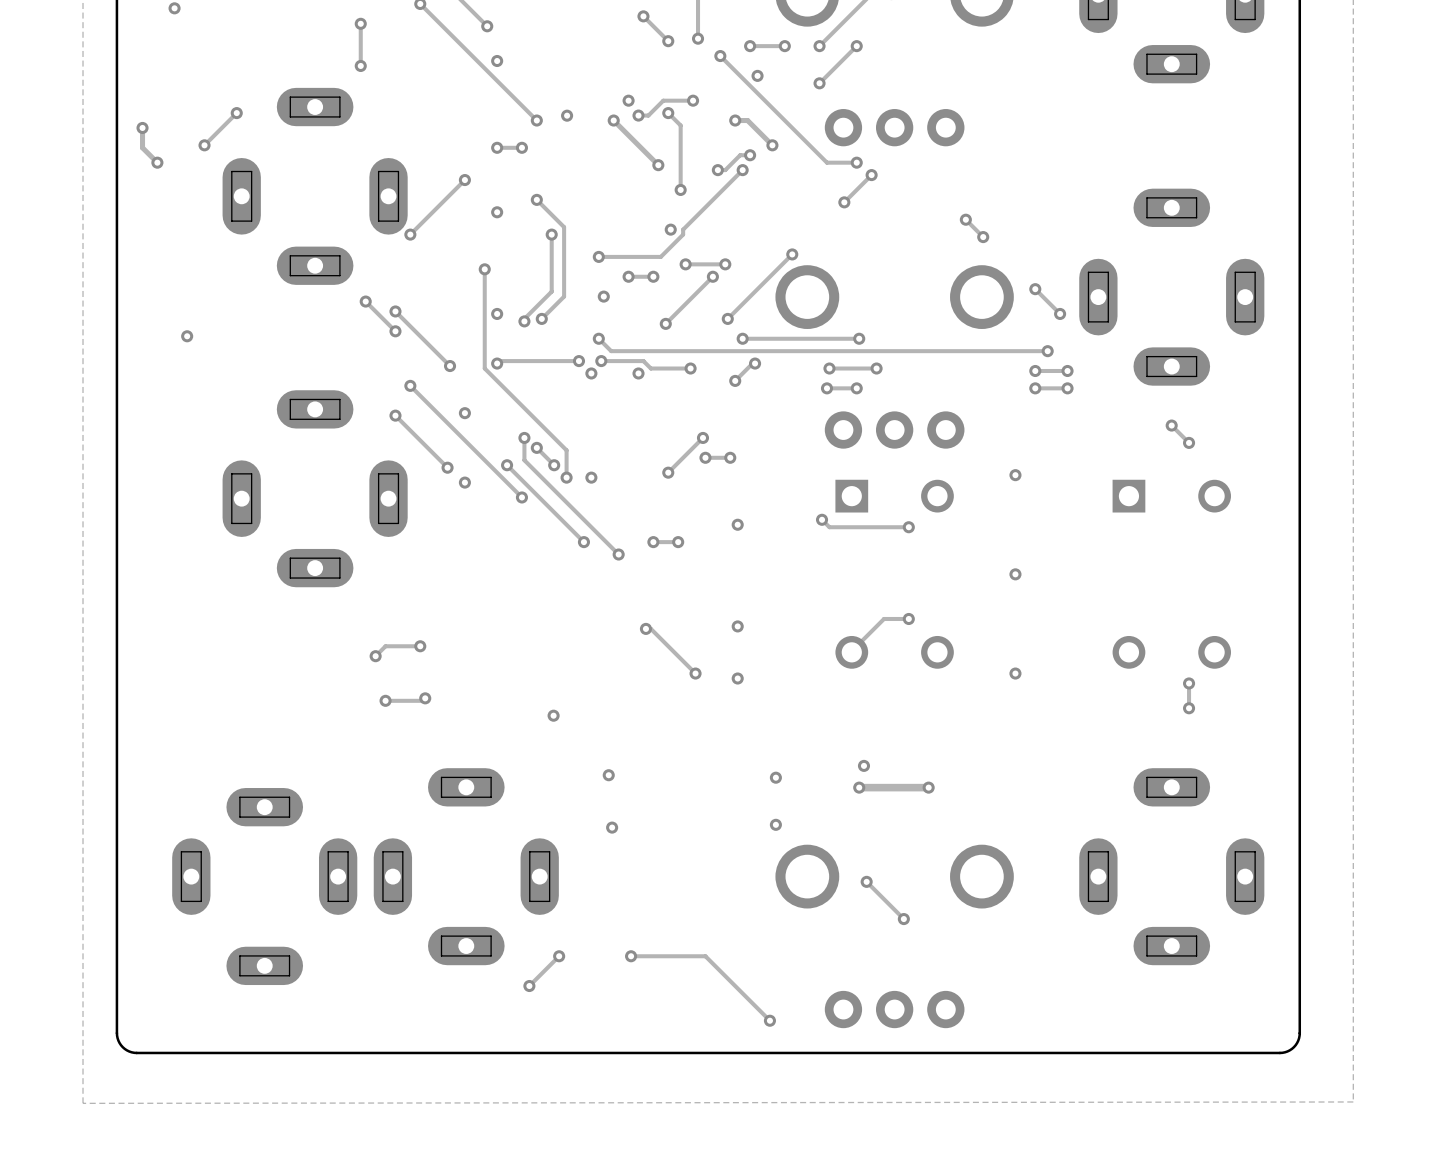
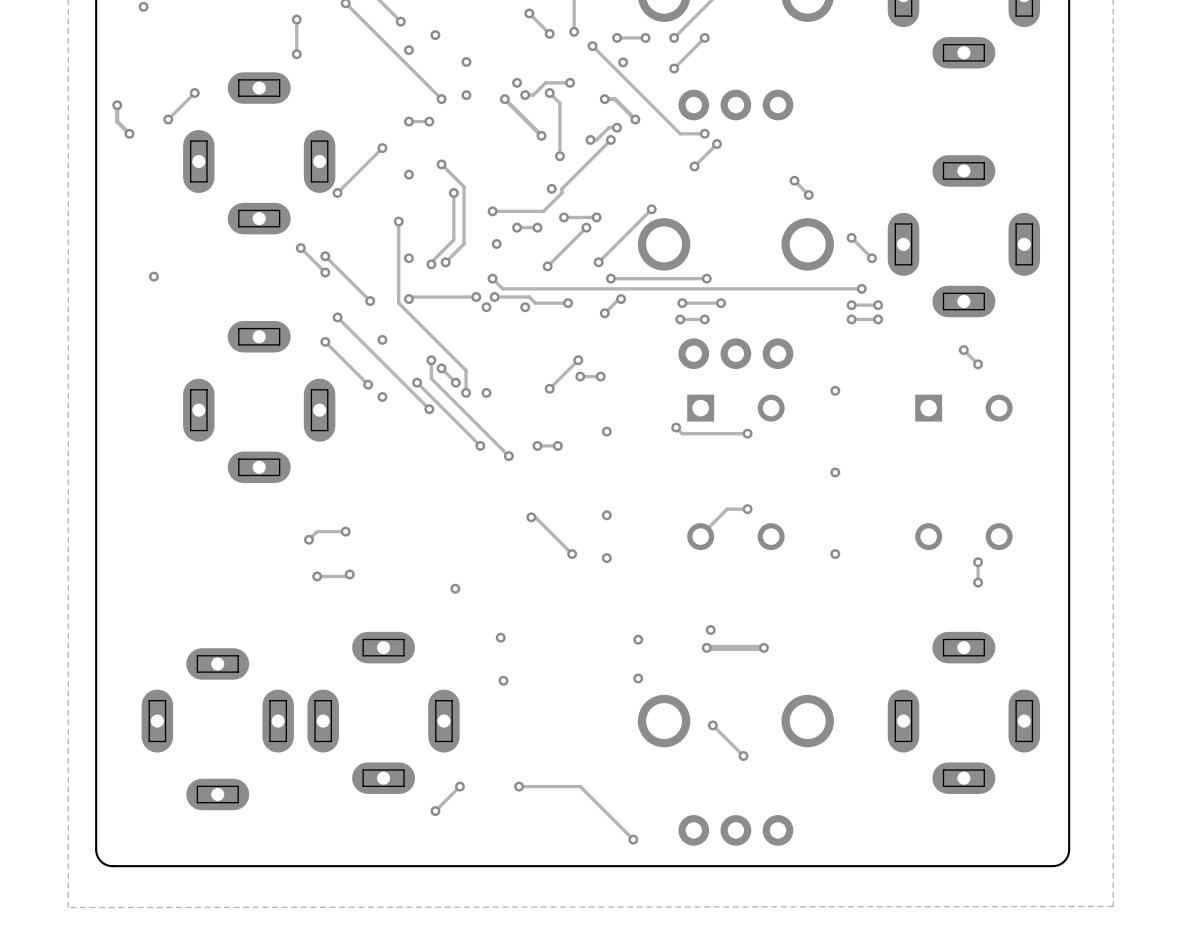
via: none -> (435, 35)
via: none -> (466, 61)

